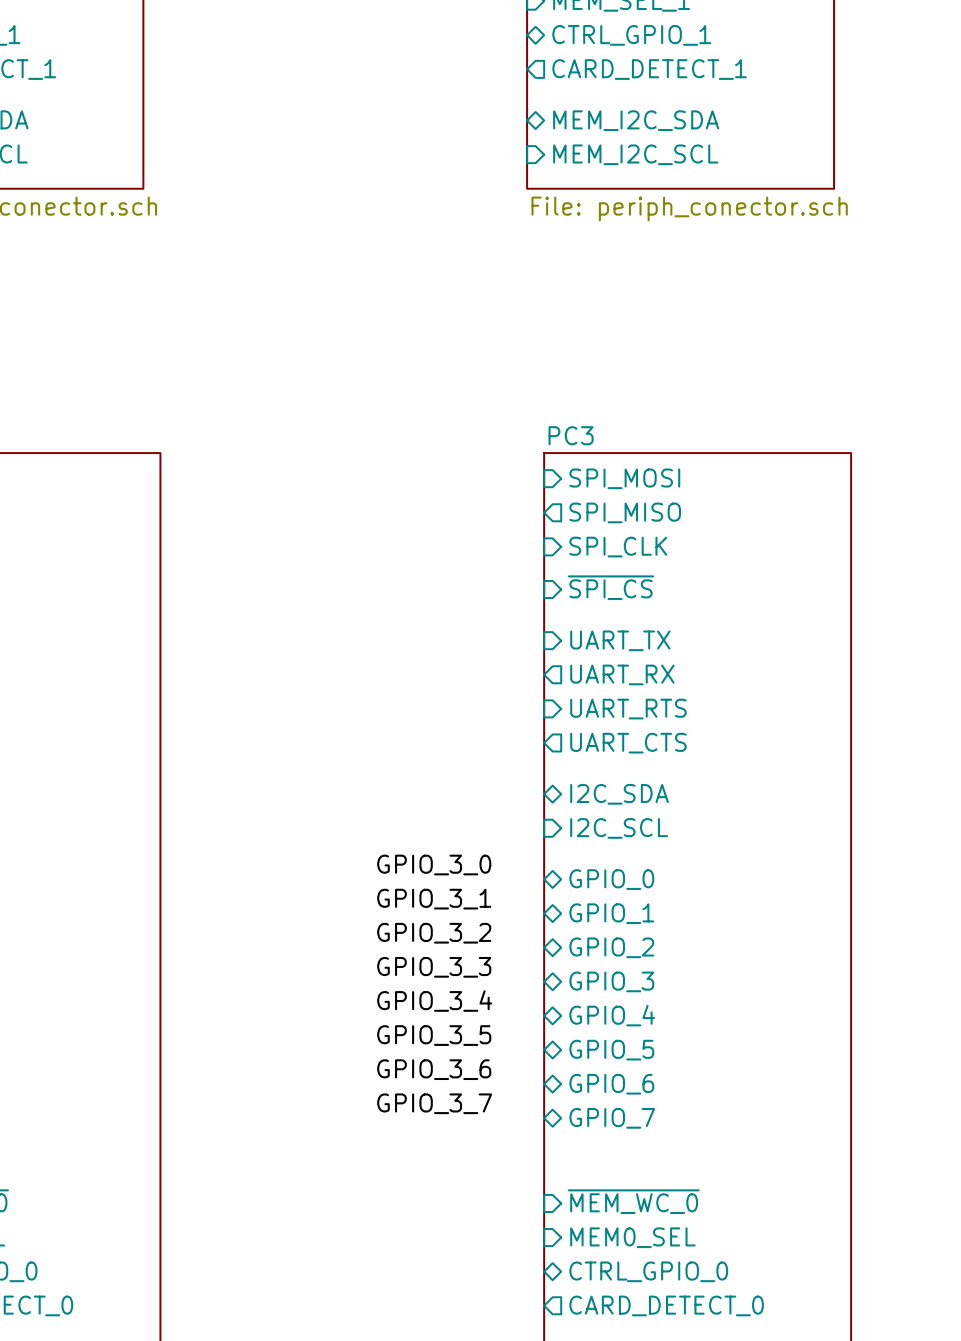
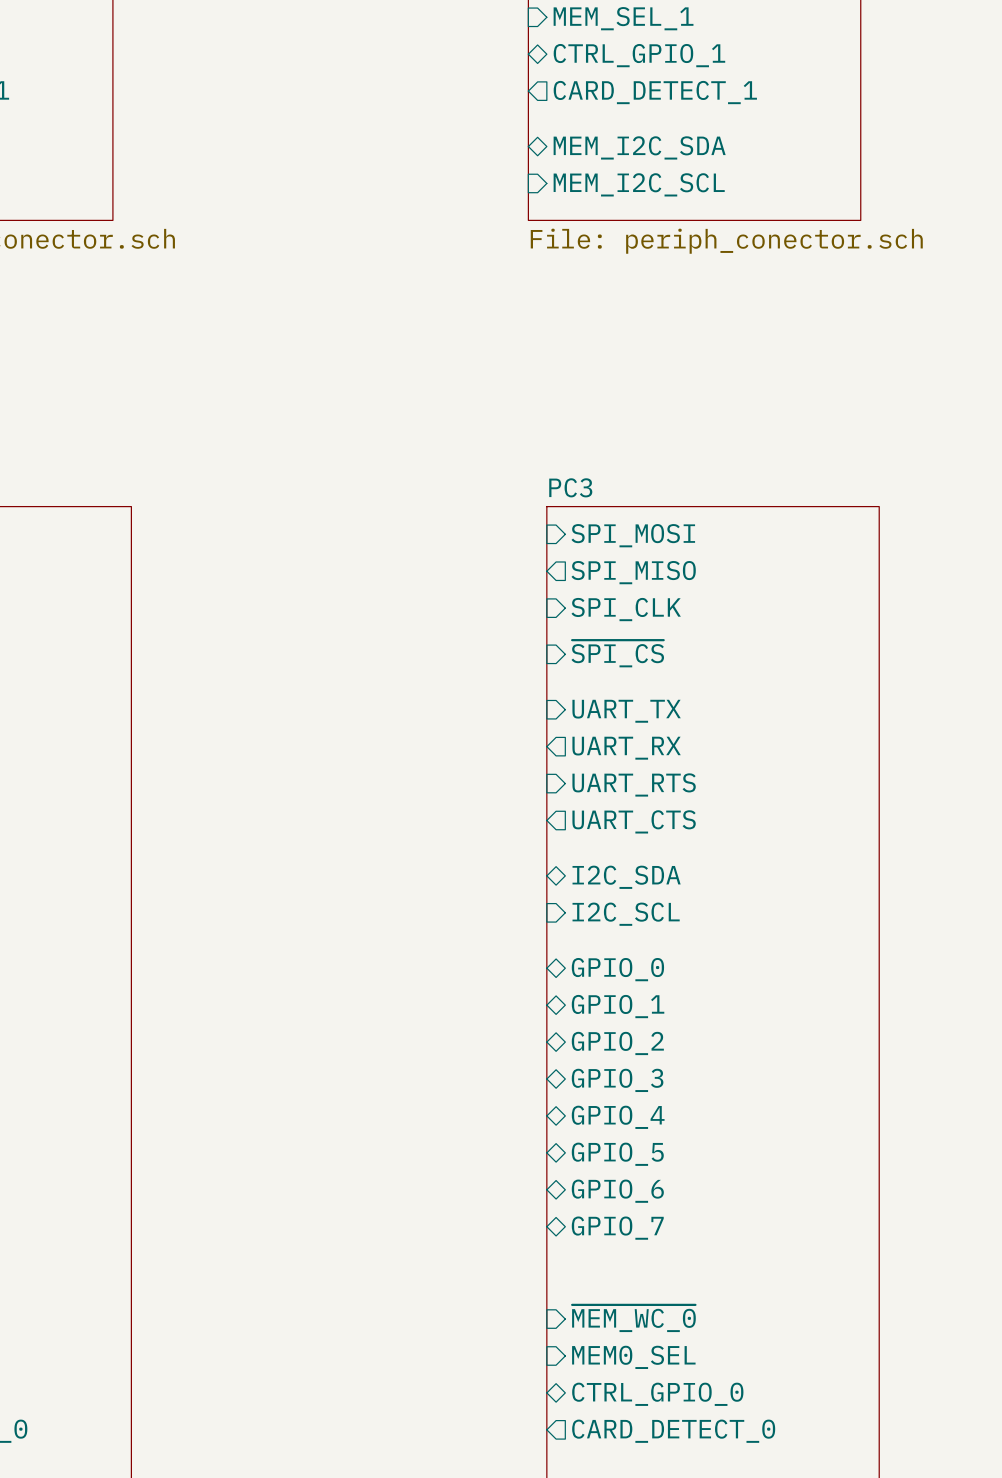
label: GPIO_3_0 (434, 865) -> none
label: GPIO_3_1 (434, 899) -> none
label: GPIO_3_2 (434, 933) -> none
label: GPIO_3_3 (434, 967) -> none
label: GPIO_3_4 (434, 1001) -> none
label: GPIO_3_5 (434, 1035) -> none
label: GPIO_3_6 (434, 1069) -> none
label: GPIO_3_7 (434, 1103) -> none

